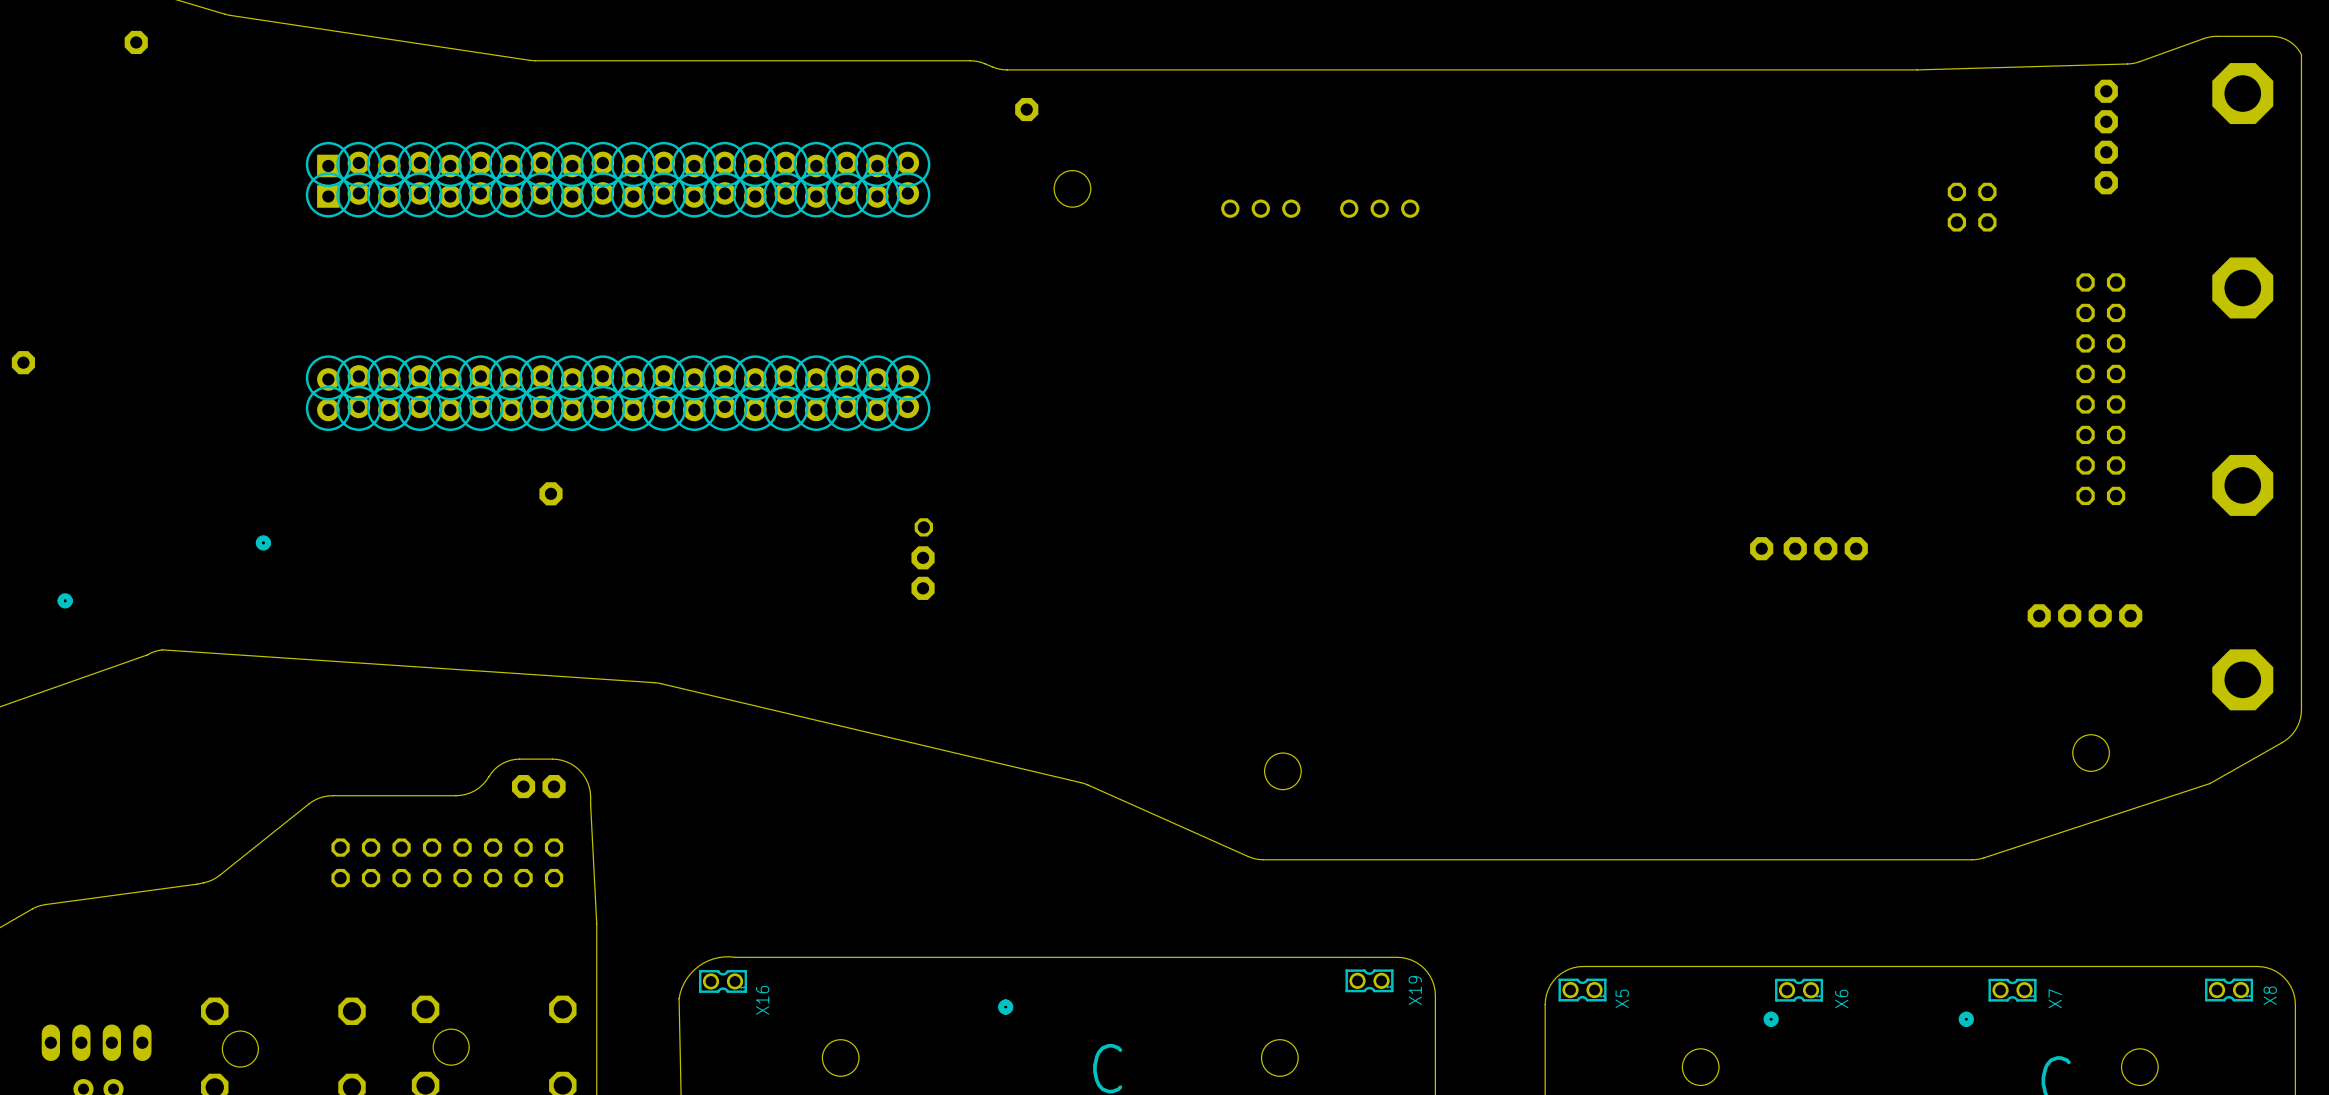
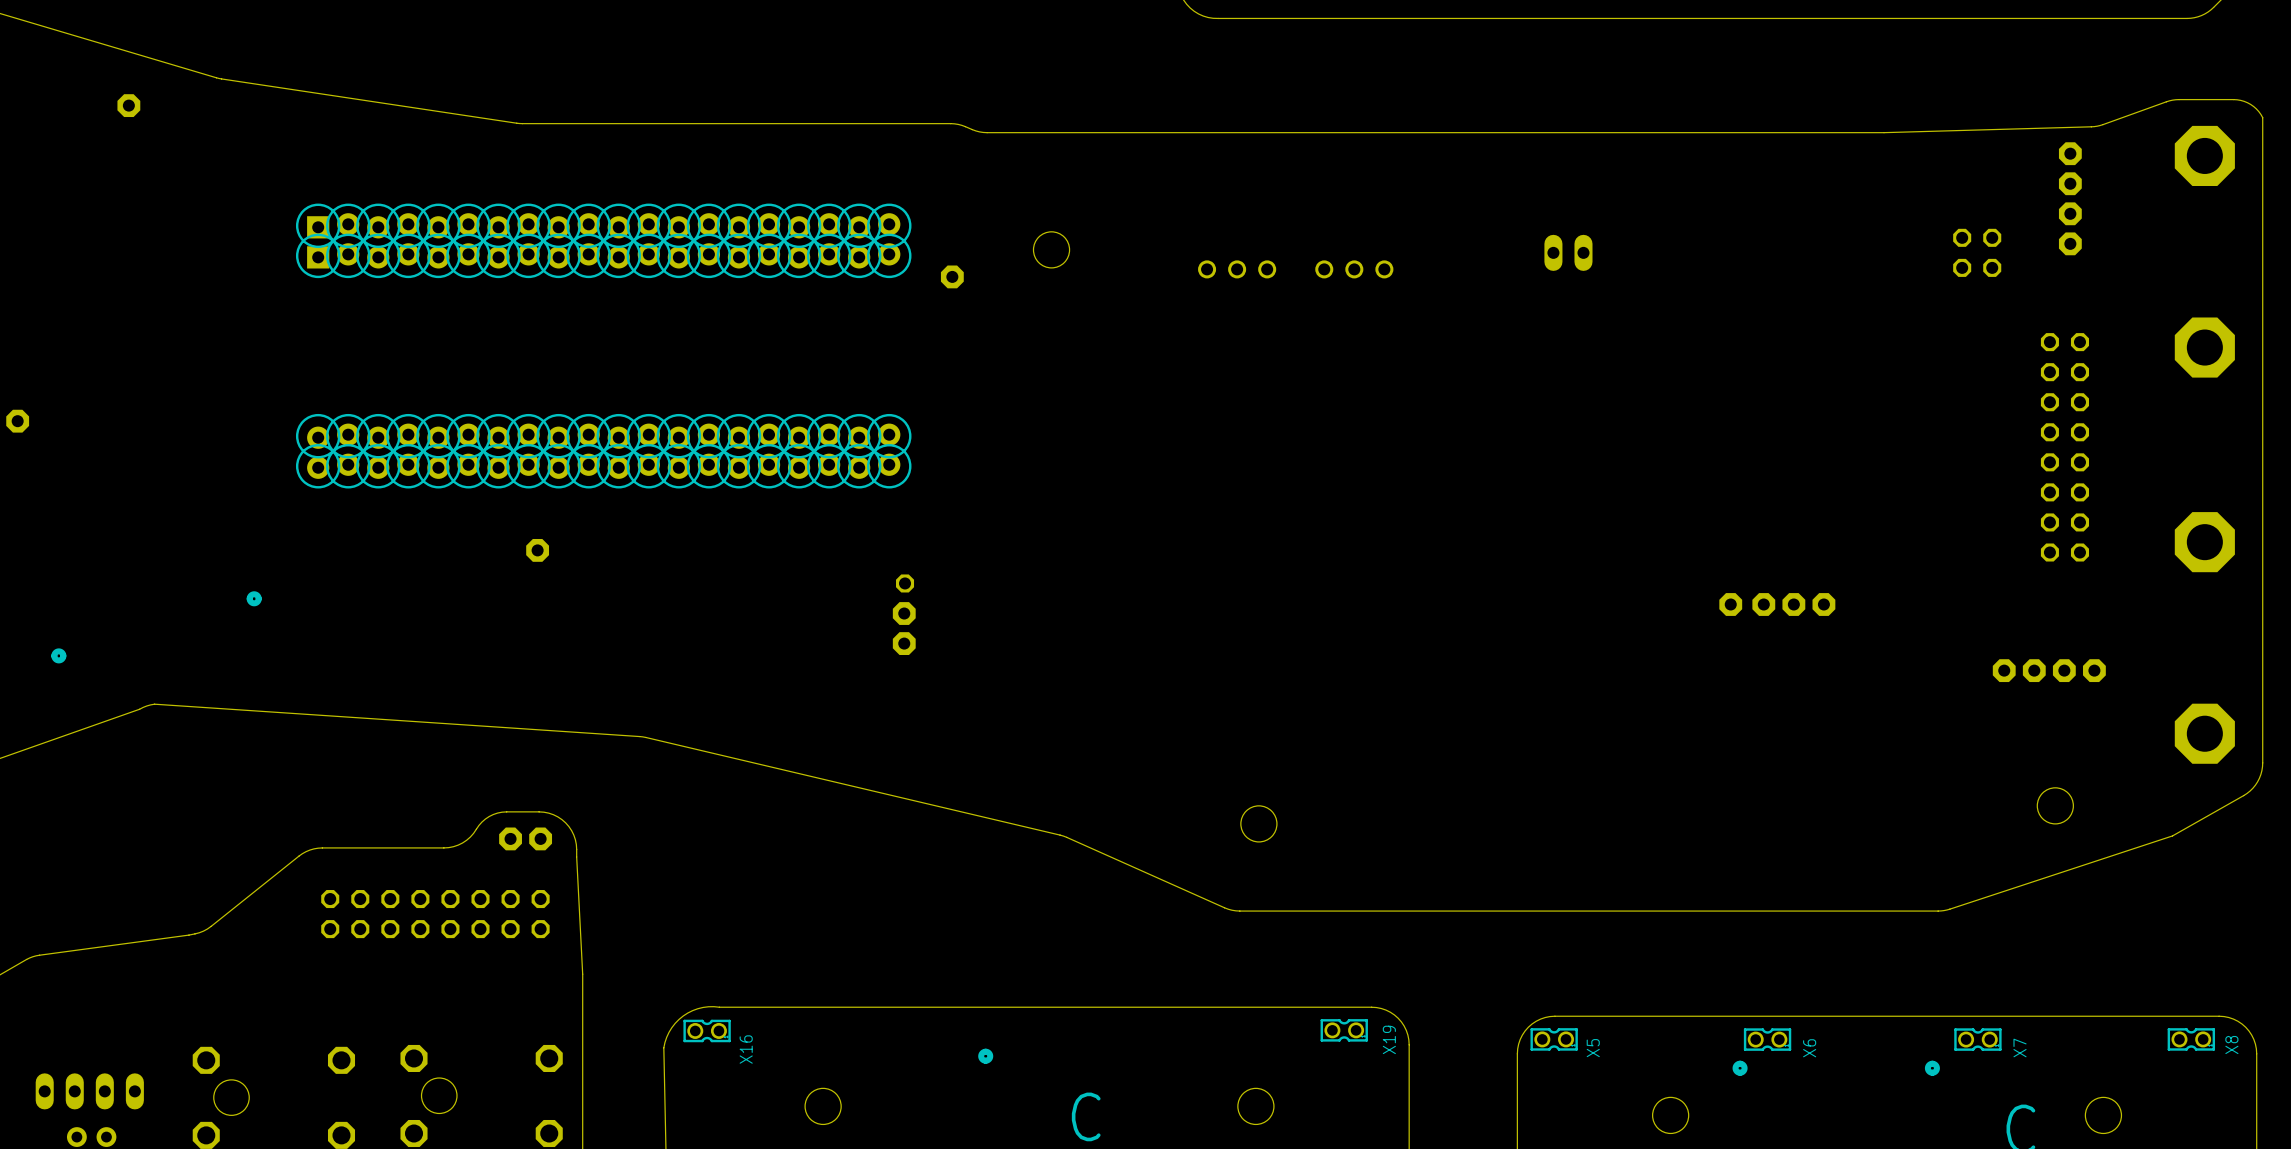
part position: (1026, 109) -> (952, 276)
part: none -> (1568, 252)
part position: (1972, 207) -> (1977, 252)

